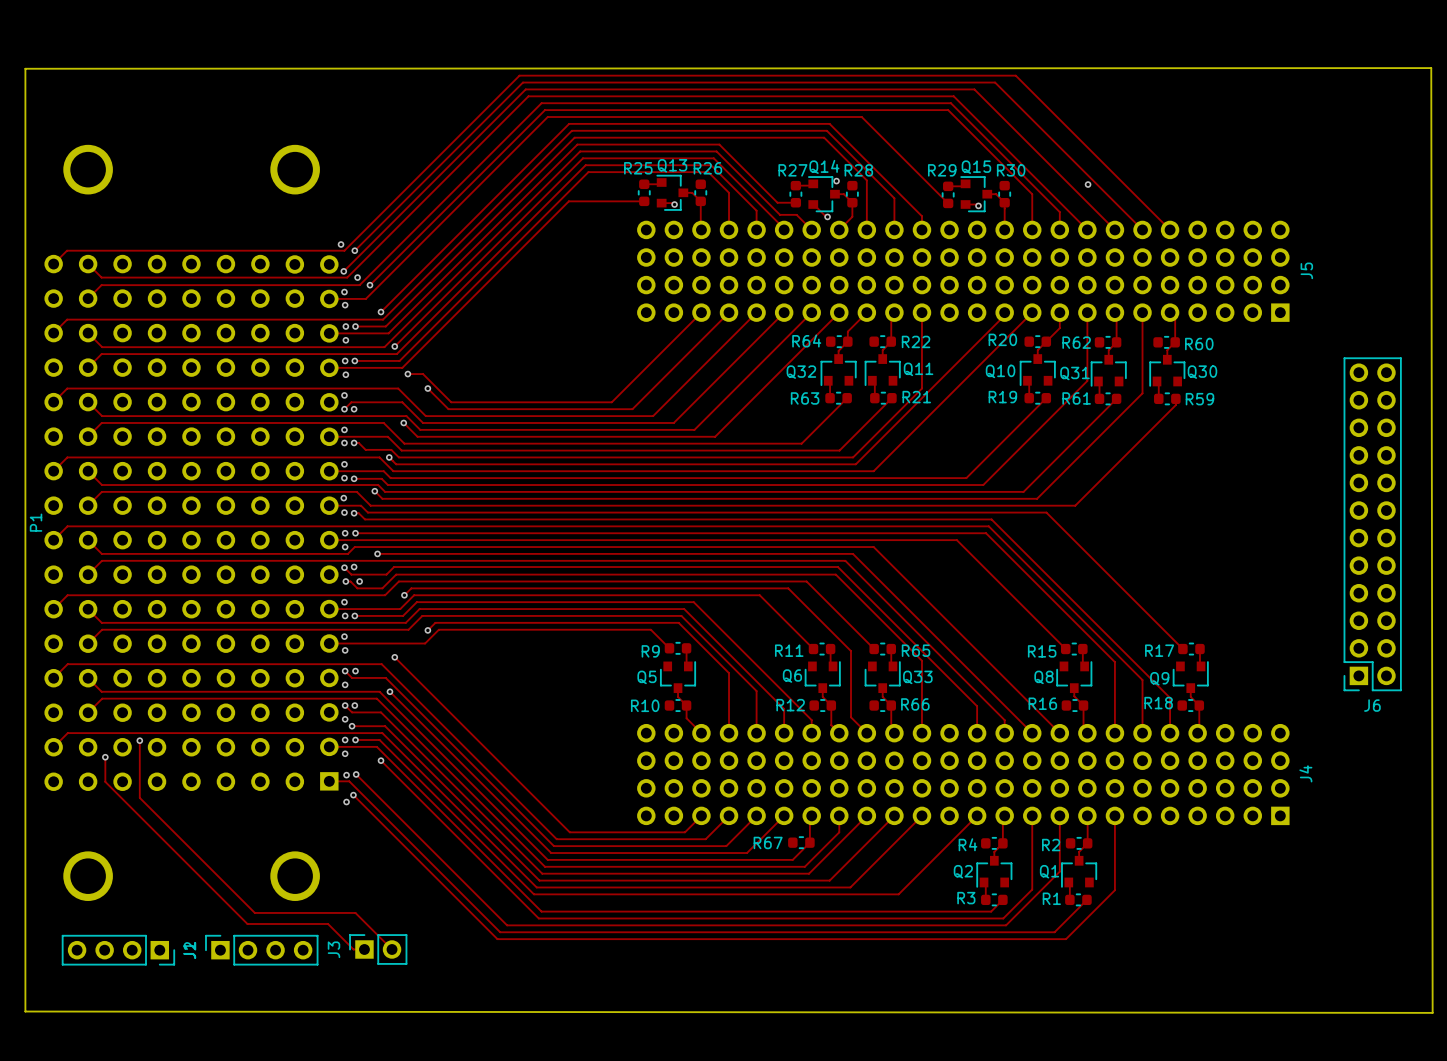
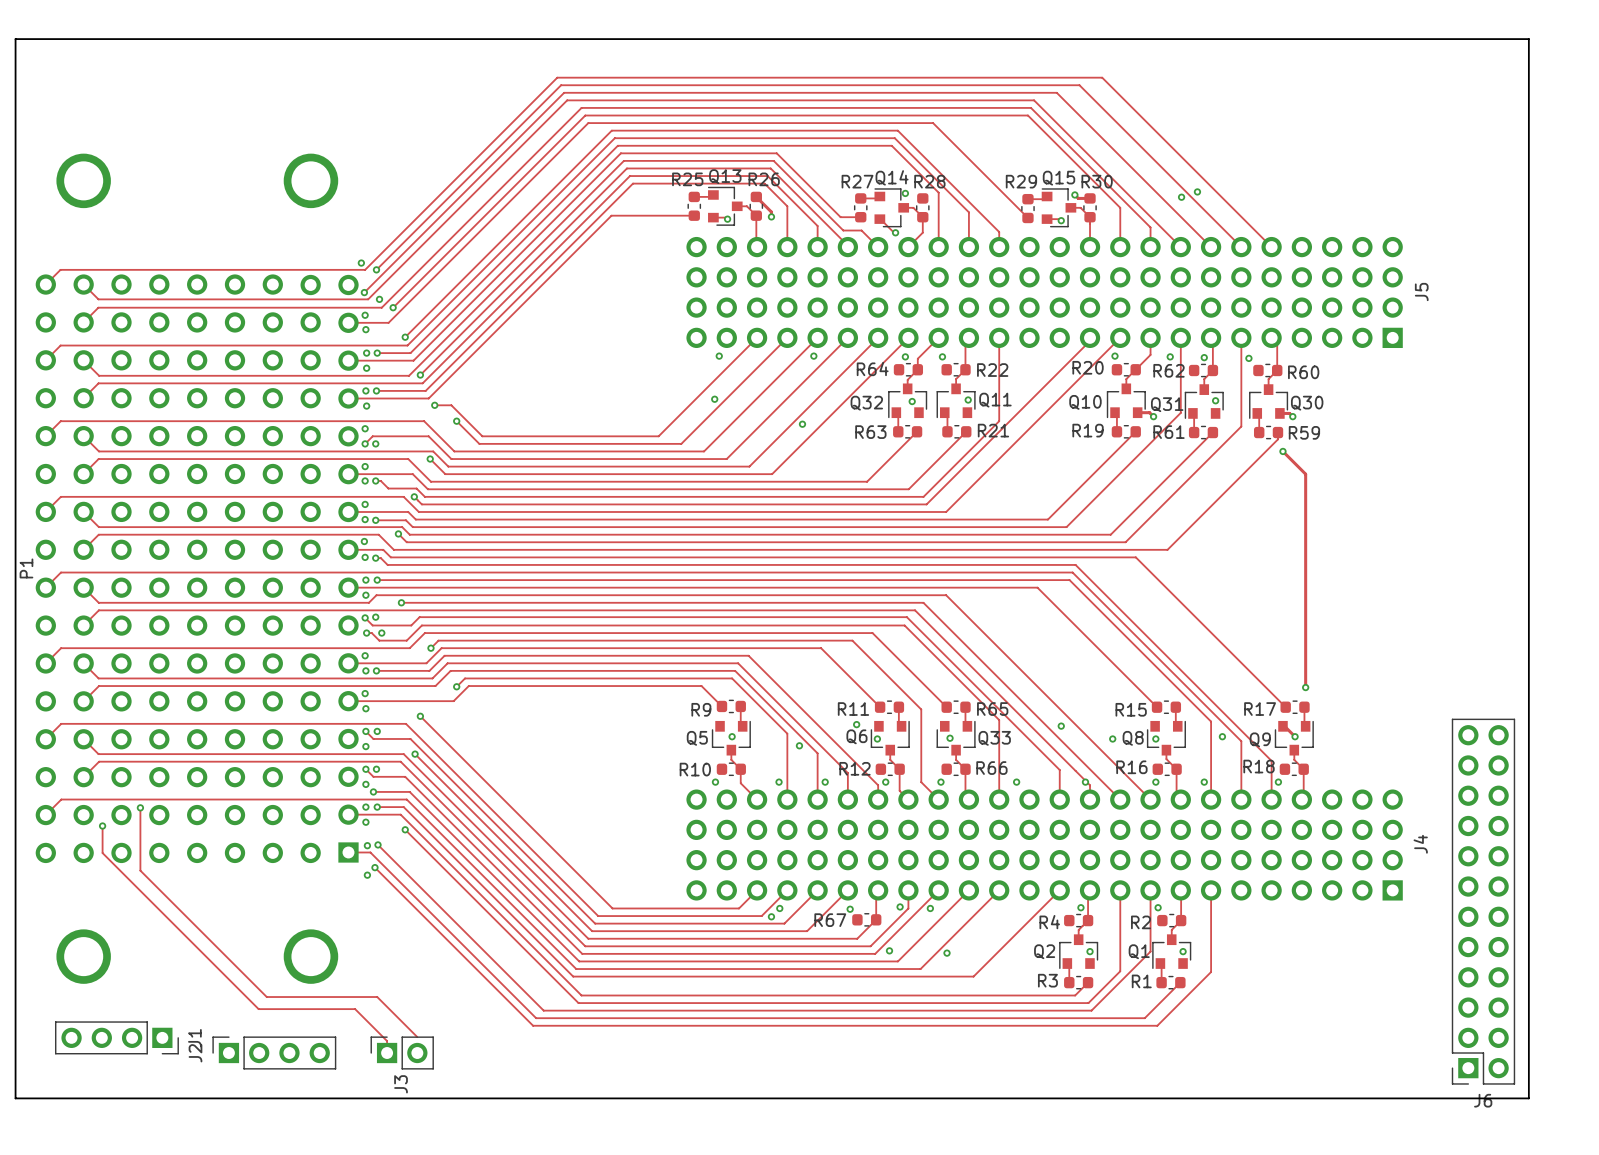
board edge: (1431, 68) (1432, 1012) (25, 1011) (25, 68) (1431, 68) -> (15, 39) (15, 1098) (1528, 1098) (1528, 39) (15, 39)
via: none -> (1197, 191)
track: none -> (1074, 194) (1078, 198) (1090, 198)
via: none -> (1074, 194)
track: none -> (756, 196) (771, 212) (771, 216)
via: none -> (771, 216)
via: none -> (719, 356)
via: none -> (813, 356)
via: none -> (905, 356)
via: none -> (942, 356)
via: none -> (1114, 356)
via: none -> (1170, 356)
via: none -> (1204, 357)
via: none -> (1248, 358)
via: none -> (714, 399)
via: none -> (968, 400)
via: none -> (1215, 400)
via: none -> (912, 401)
track: none -> (1137, 412) (1149, 412) (1153, 416)
track: none -> (1279, 413) (1289, 413) (1292, 416)
via: none -> (1153, 416)
via: none -> (1292, 416)
via: none -> (802, 424)
track: none -> (1282, 451) (1305, 474) (1305, 687)
via: none -> (1282, 451)
J6 position: (1372, 524) -> (1483, 901)
via: none -> (1305, 687)
via: none -> (856, 724)
via: none -> (1061, 726)
track: none -> (1282, 726) (1295, 736)
via: none -> (732, 736)
via: none -> (1222, 736)
via: none -> (1295, 736)
via: none -> (877, 738)
via: none -> (950, 738)
via: none -> (1112, 738)
via: none -> (1155, 738)
via: none -> (799, 745)
via: none -> (715, 782)
via: none -> (779, 782)
via: none -> (825, 782)
via: none -> (885, 782)
via: none -> (940, 782)
via: none -> (1016, 782)
via: none -> (1085, 782)
via: none -> (1155, 782)
via: none -> (1204, 782)
via: none -> (1278, 782)
via: none -> (900, 906)
via: none -> (1080, 907)
via: none -> (1158, 907)
via: none -> (779, 908)
via: none -> (930, 908)
via: none -> (850, 909)
via: none -> (771, 916)
via: none -> (889, 950)
via: none -> (1090, 951)
via: none -> (1183, 951)
via: none -> (947, 953)
track: (328, 924) (353, 949) (364, 949) -> (347, 1009) (355, 1009) (387, 1041) (387, 1053)
J3 name position: J3 (333, 949) -> J3 (401, 1084)
J3 position: (378, 949) -> (402, 1053)
J2 position: (261, 950) -> (274, 1053)

